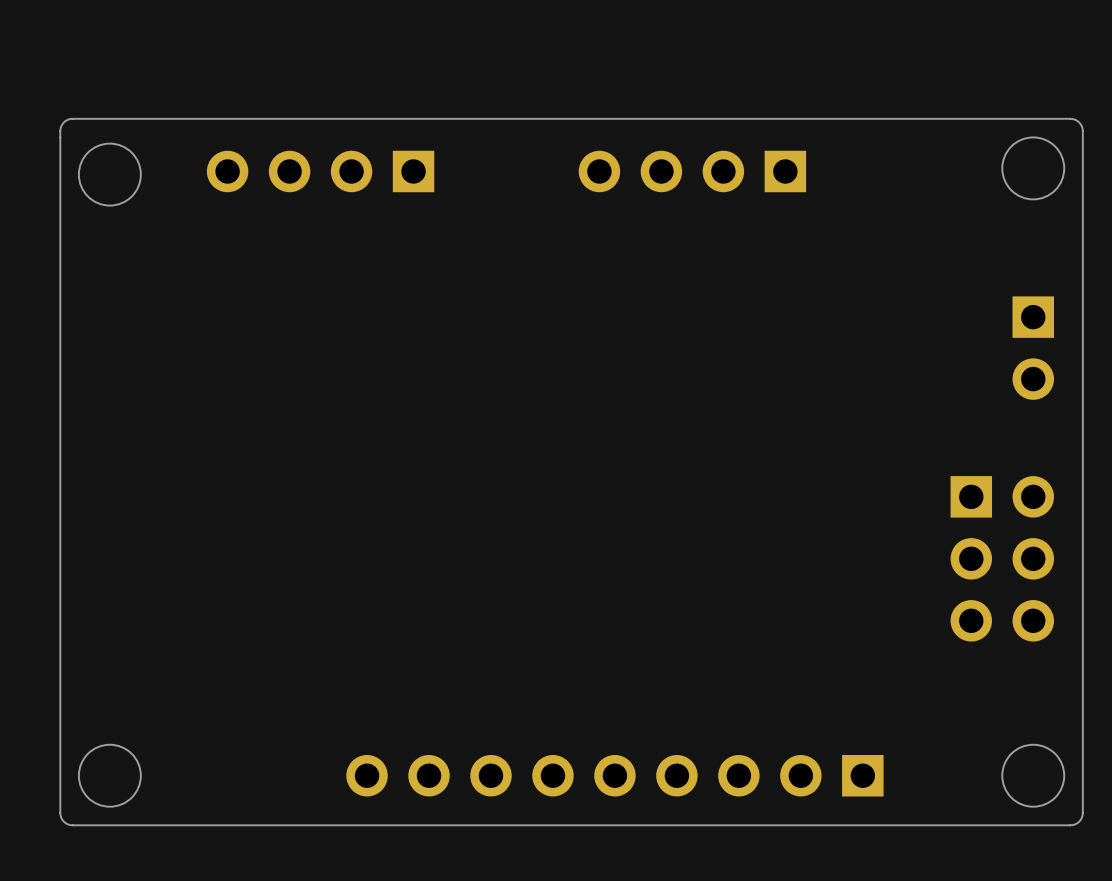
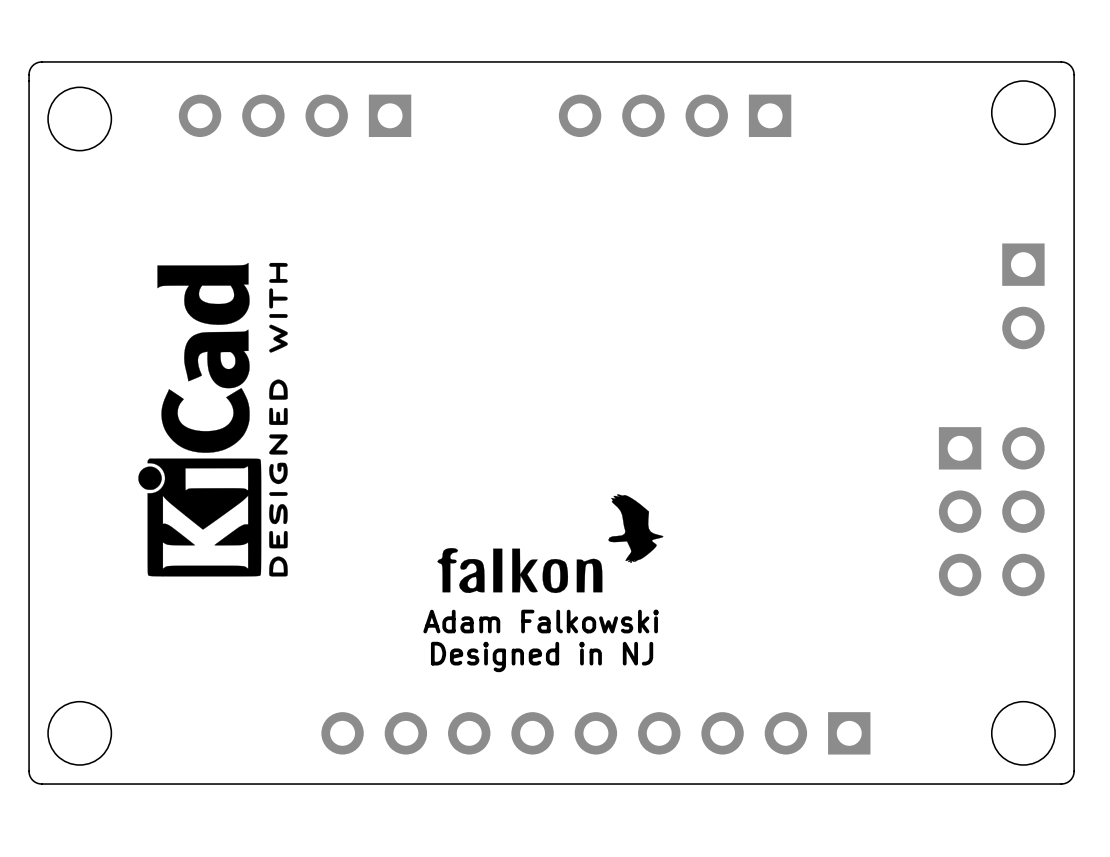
drawing: none -> [138, 262, 288, 577]
drawing: none -> [437, 494, 664, 594]
text: none -> Adam Falkowski (541, 621)
text: none -> Designed in NJ (542, 656)

